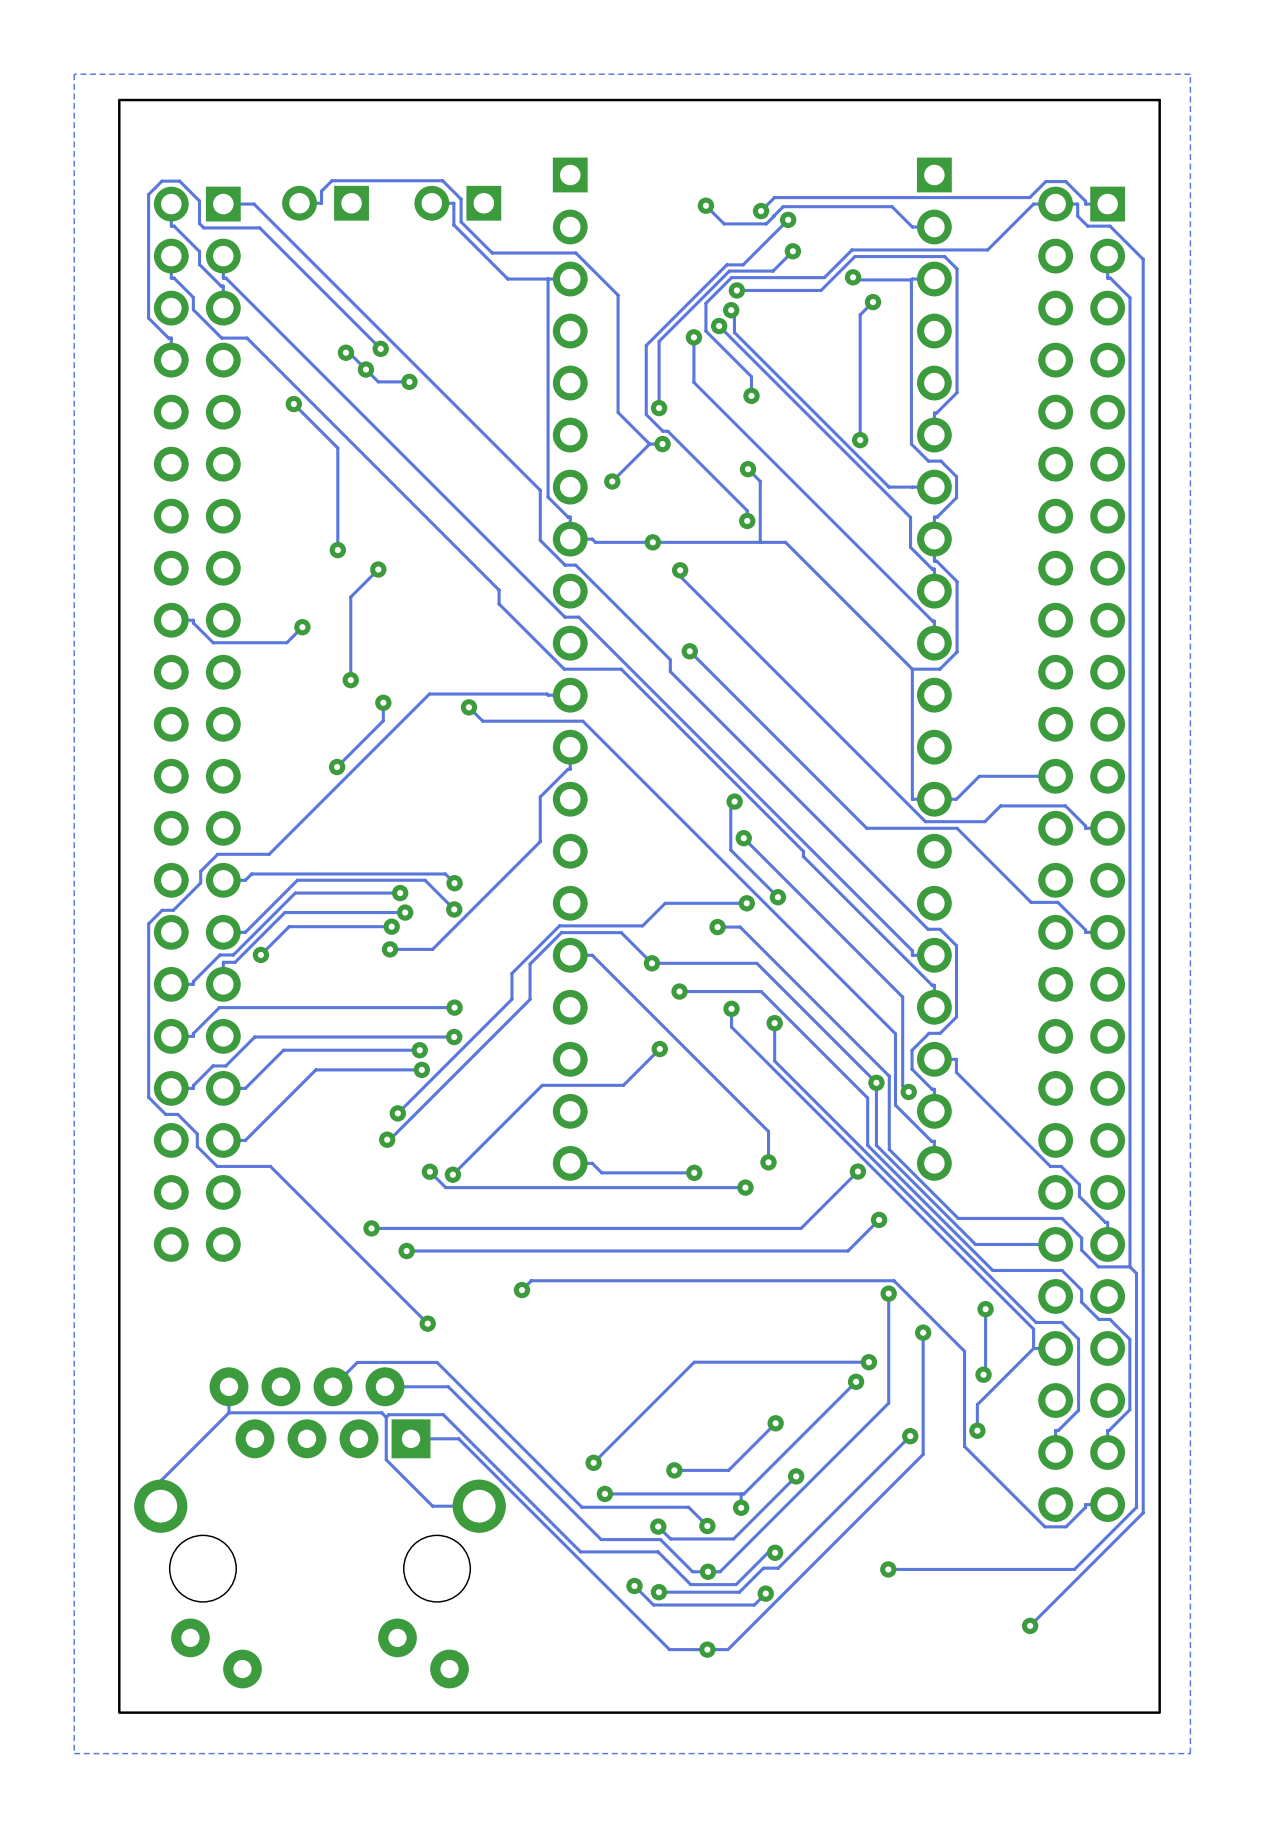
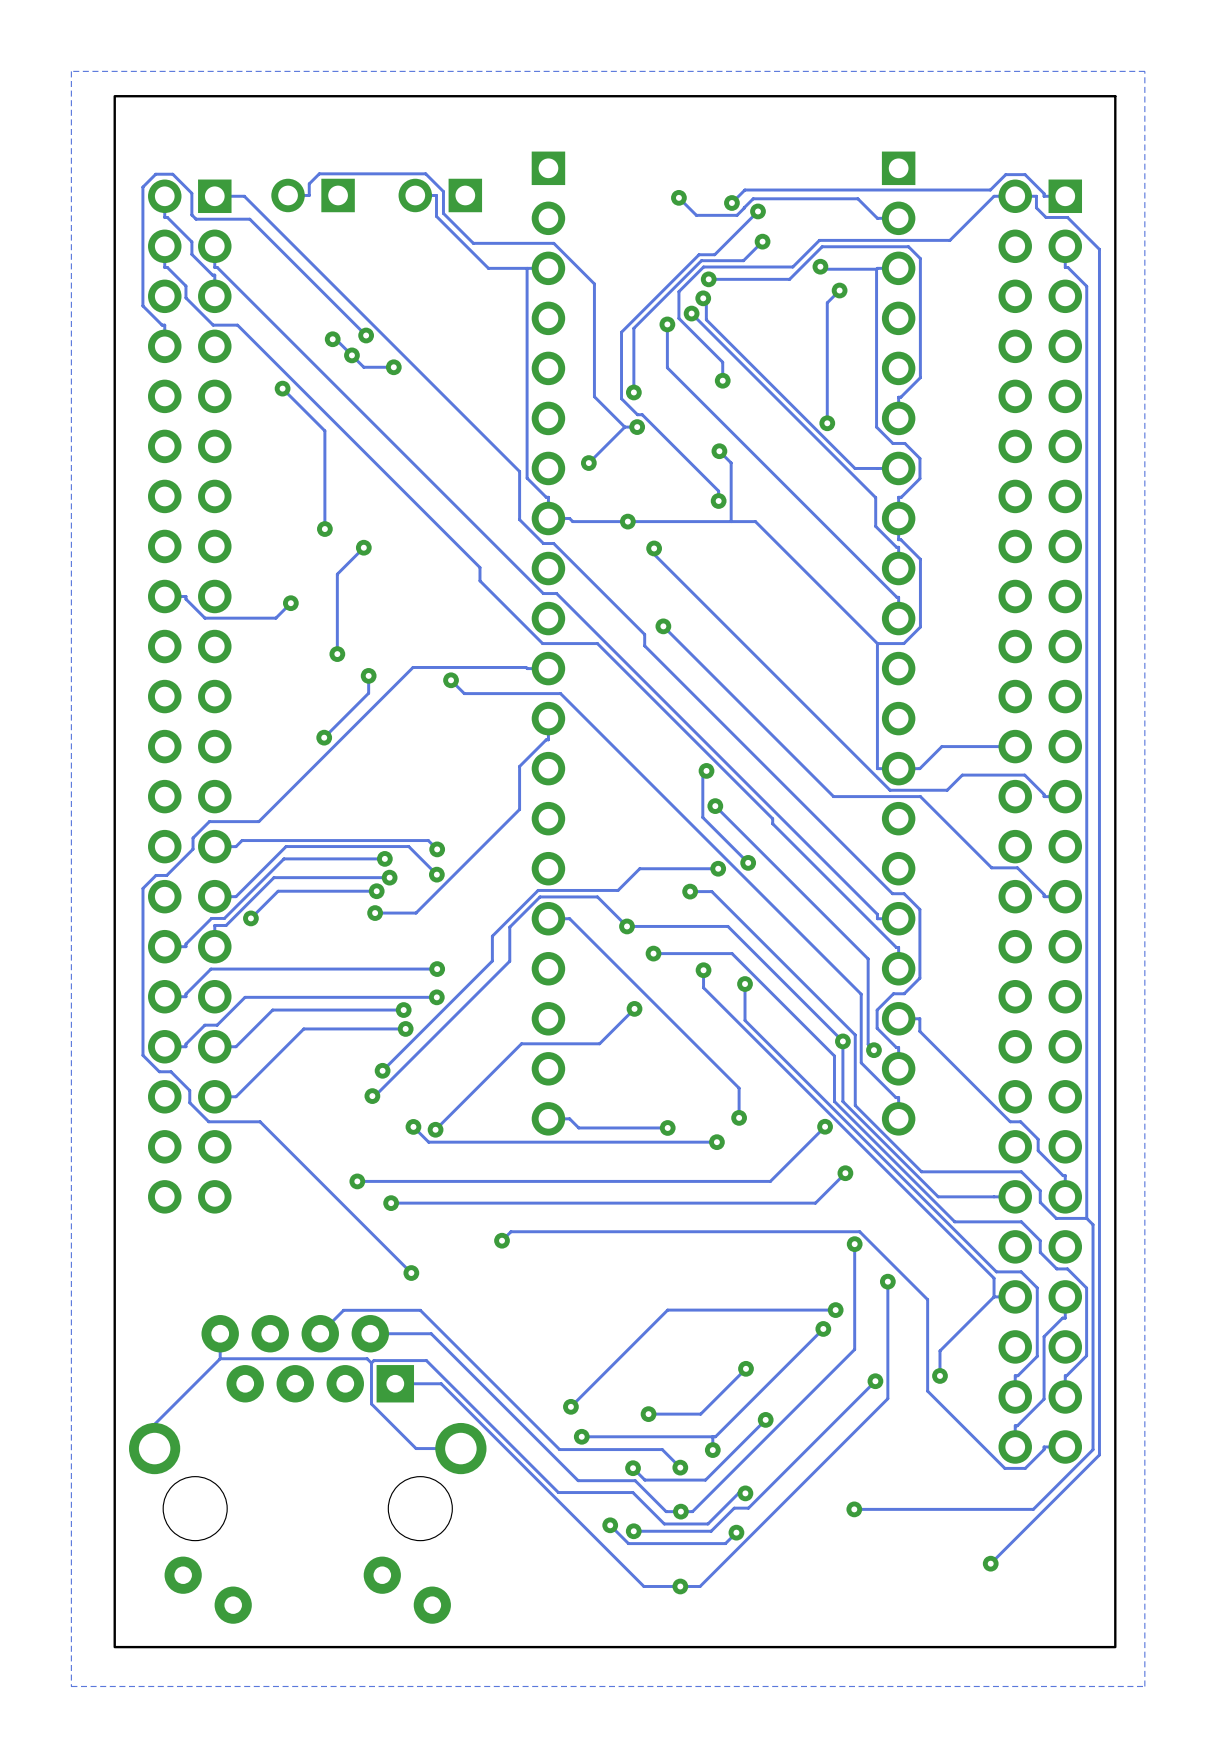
track: (985, 1309) (985, 1372) (983, 1374) -> none
via: (985, 1309) -> none
track: none -> (1065, 1296) (1065, 1318) (1062, 1318) (1044, 1336) (1044, 1399) (1015, 1425) (1015, 1446)
via: (983, 1374) -> none

